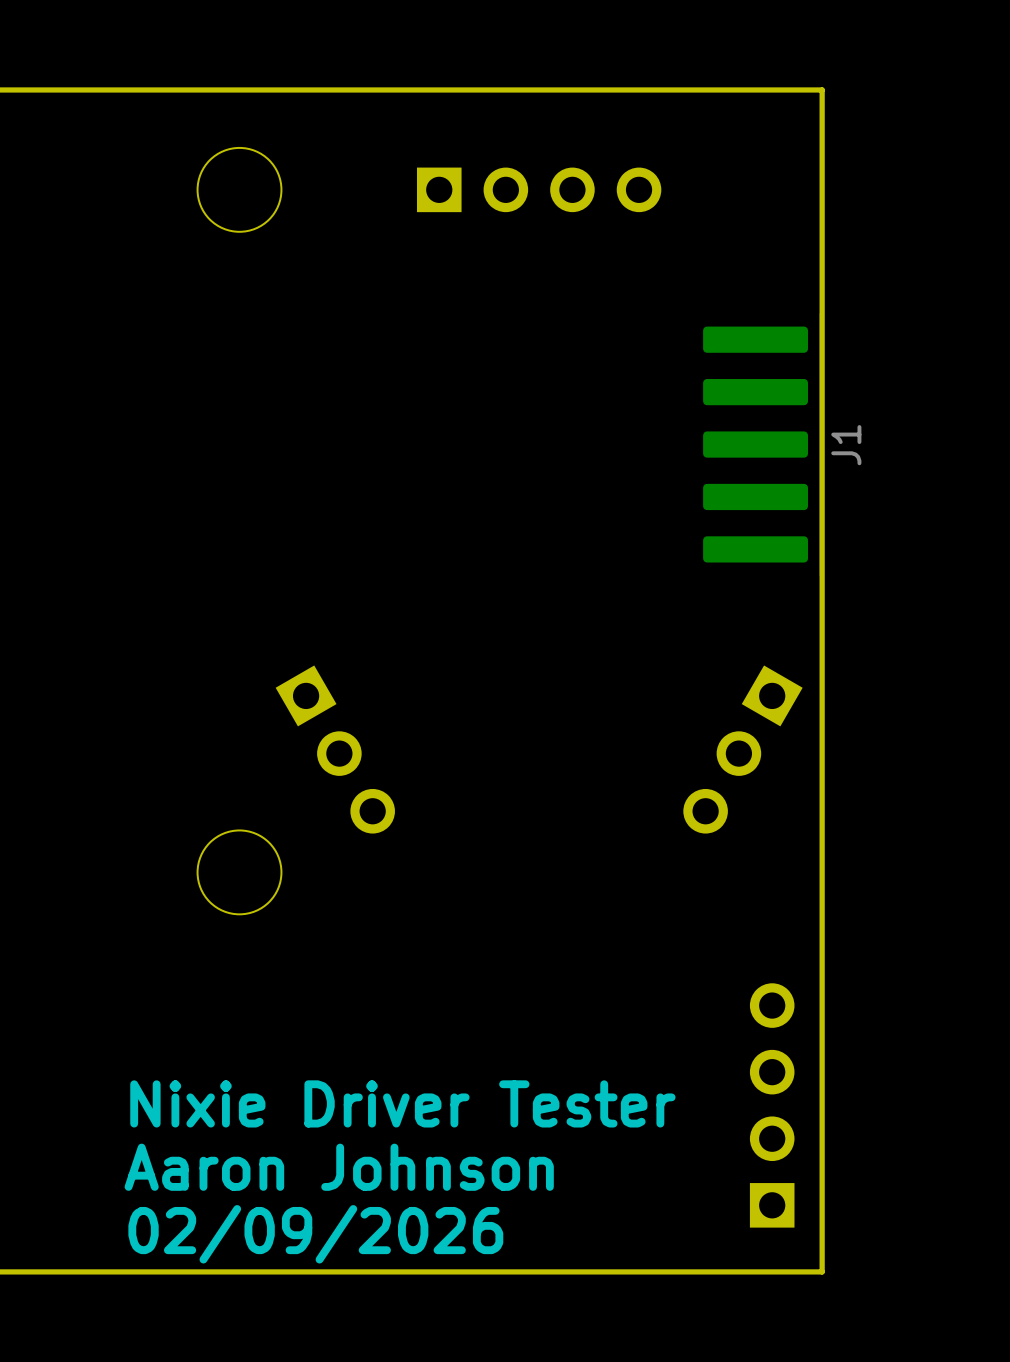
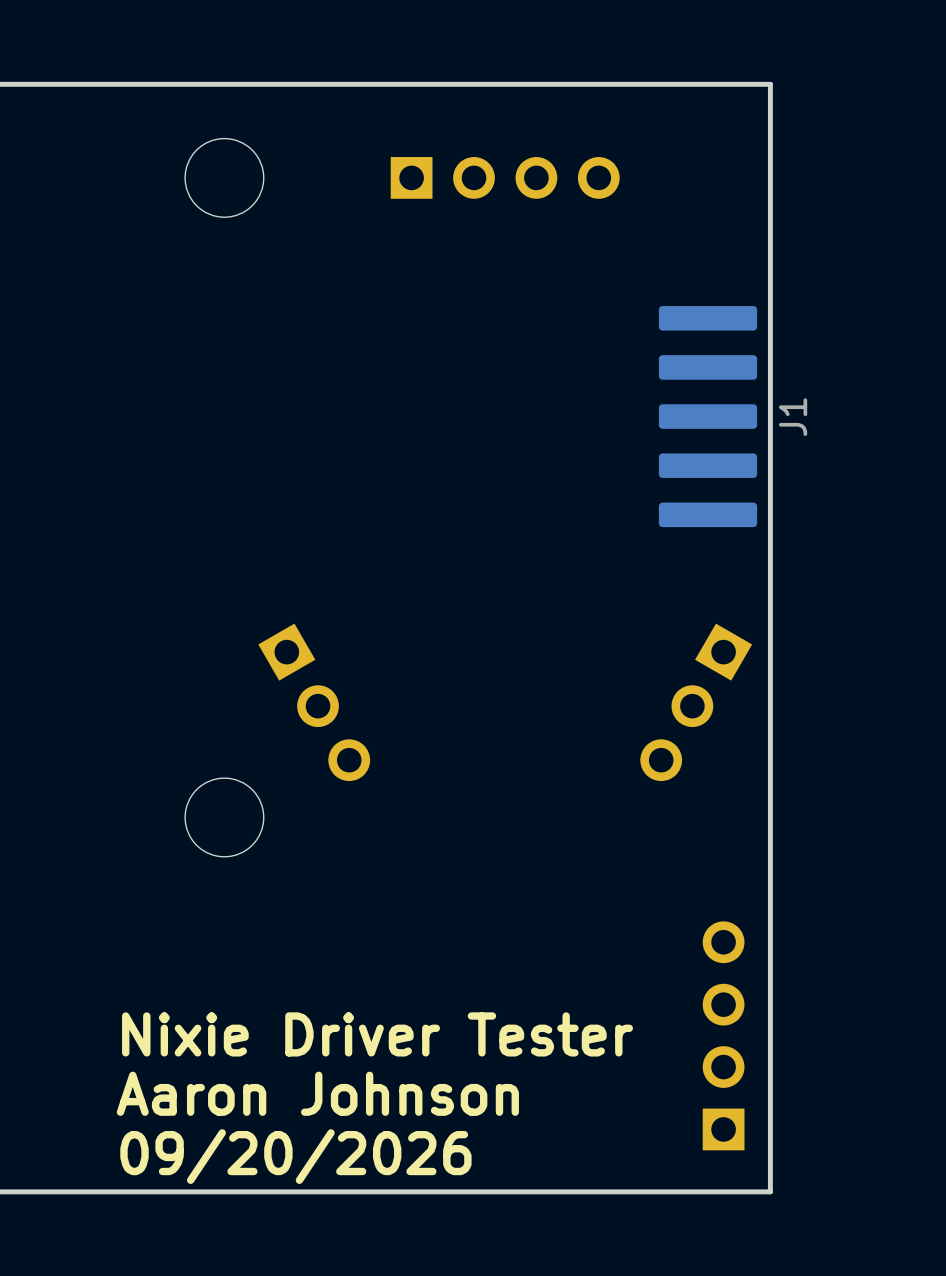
text: 02/09/2026 (315, 1234) -> 09/20/2026 (295, 1156)

